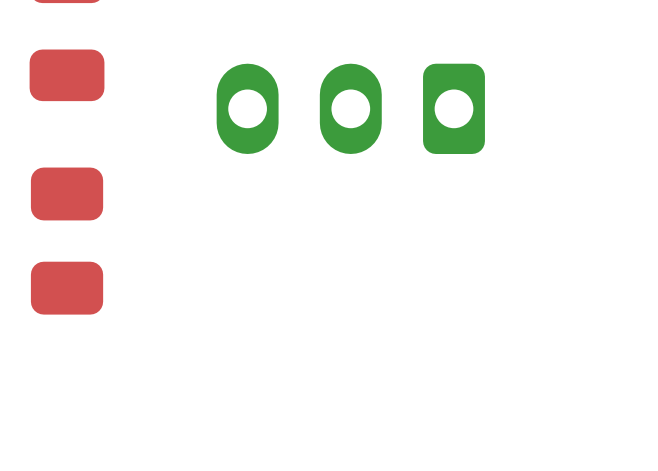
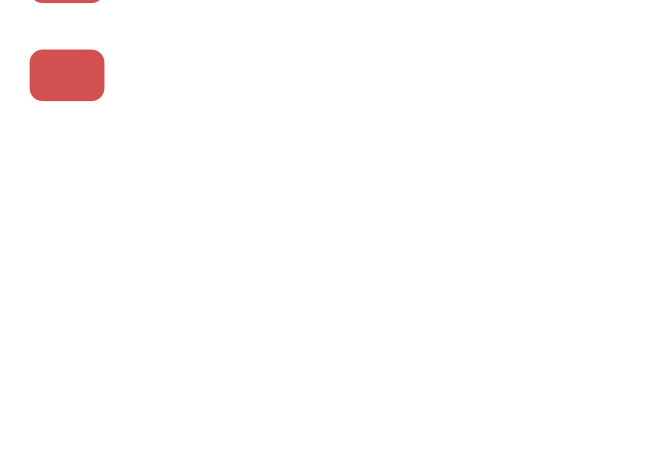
part: (350, 108) -> none
part: (67, 241) -> none

